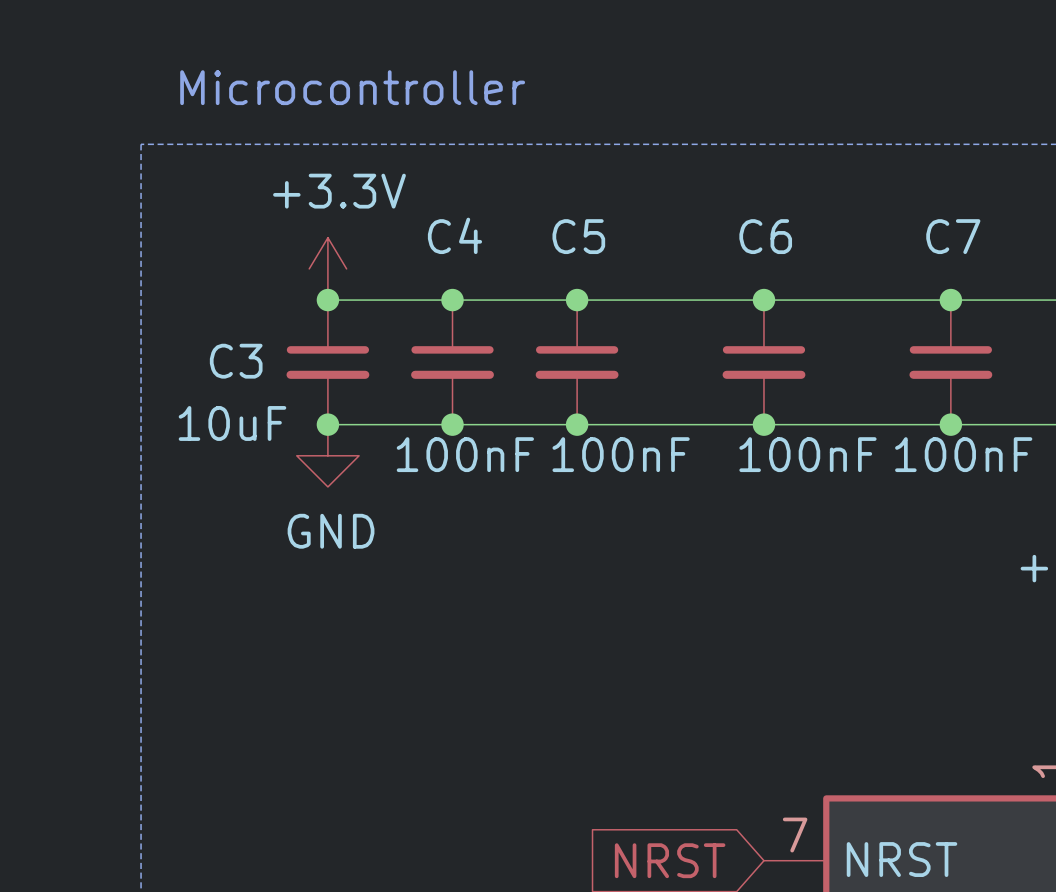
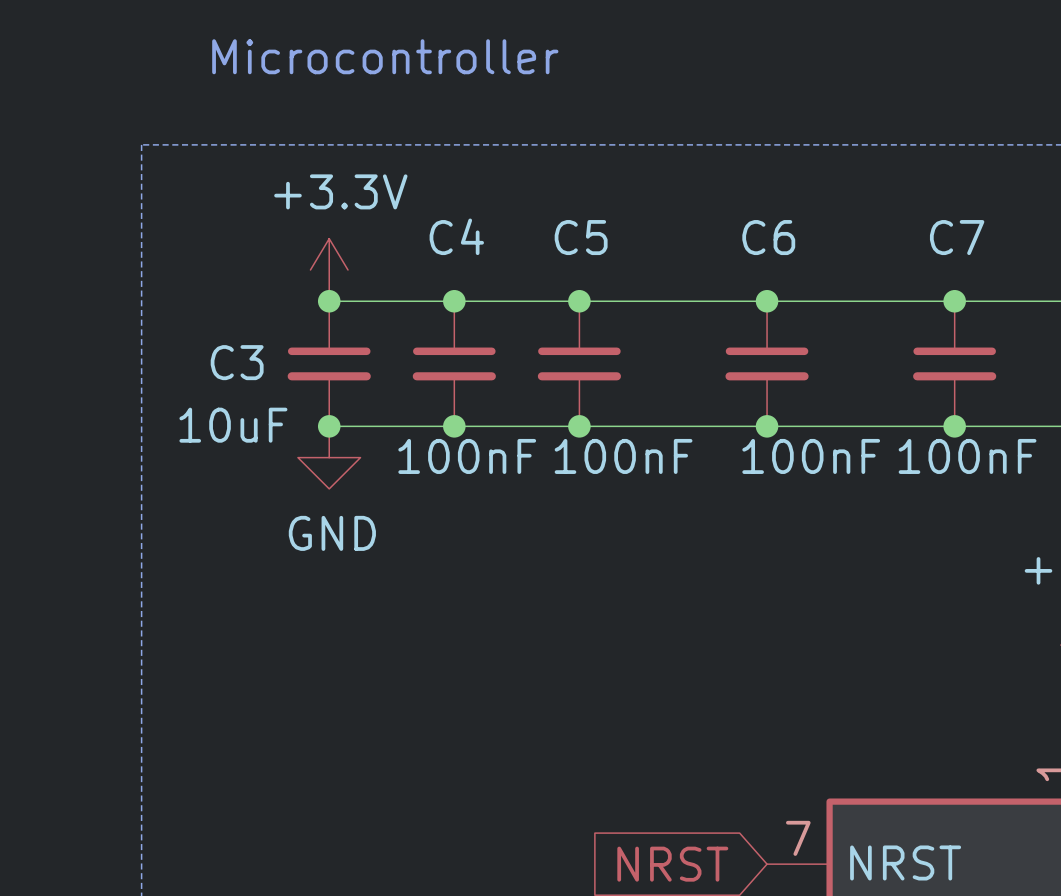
text position: Microcontroller (352, 87) -> Microcontroller (385, 56)

